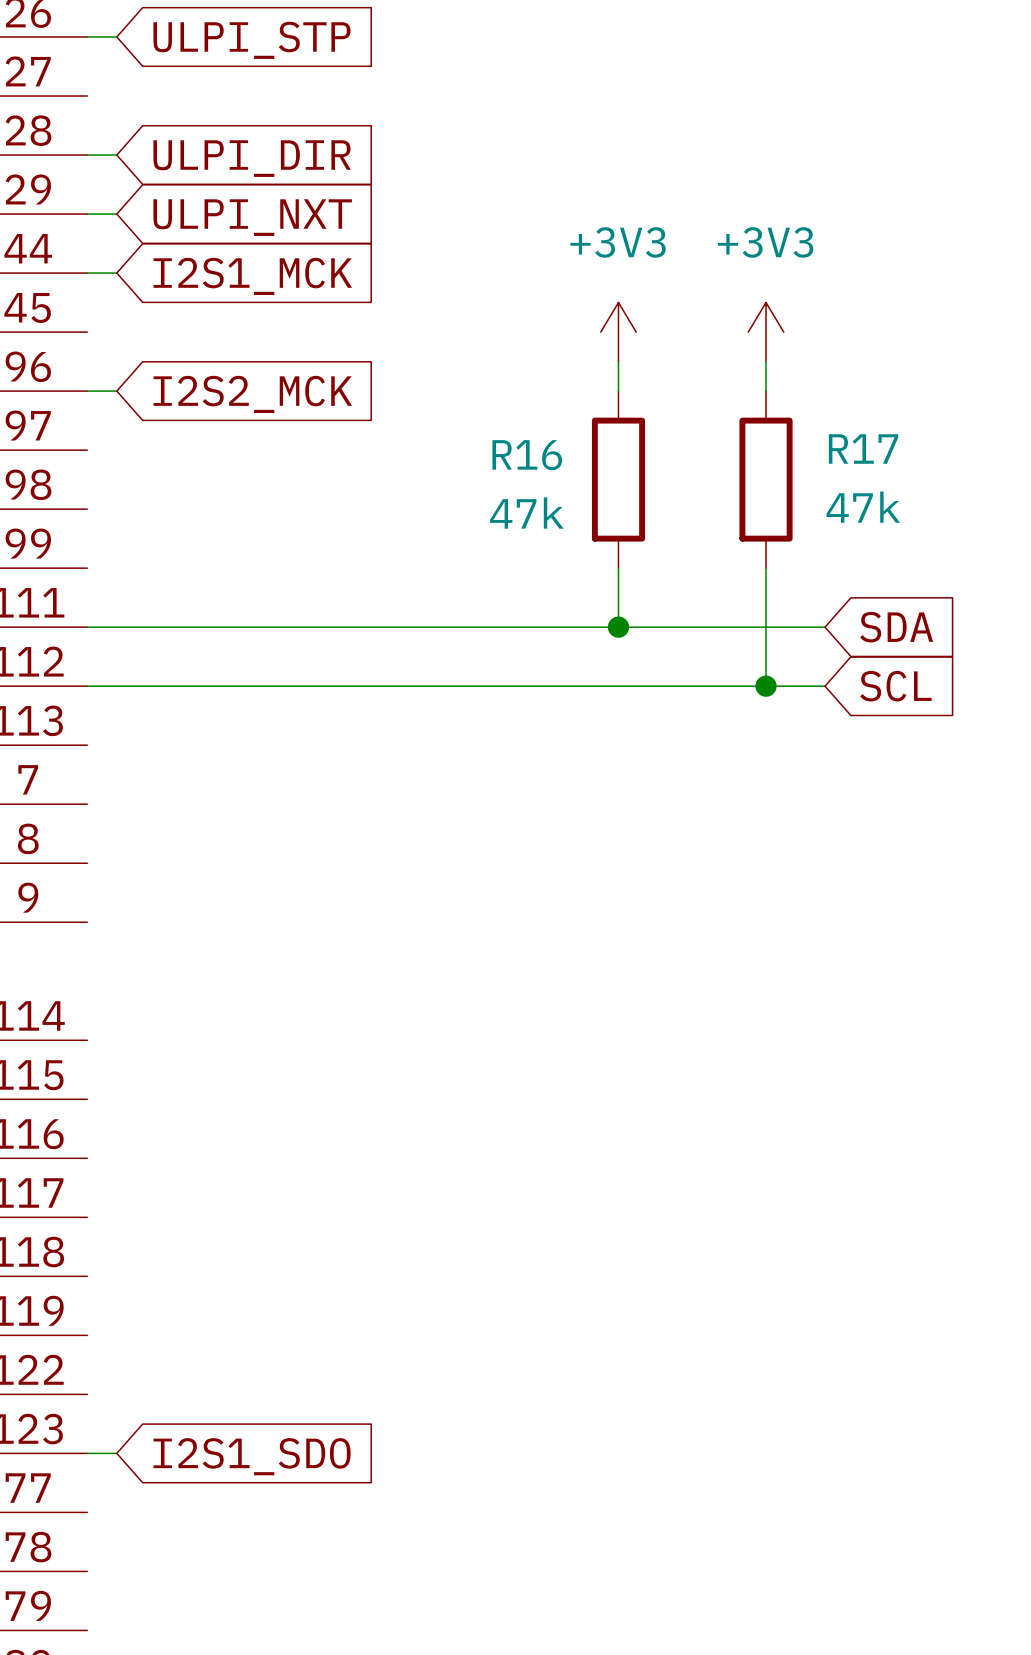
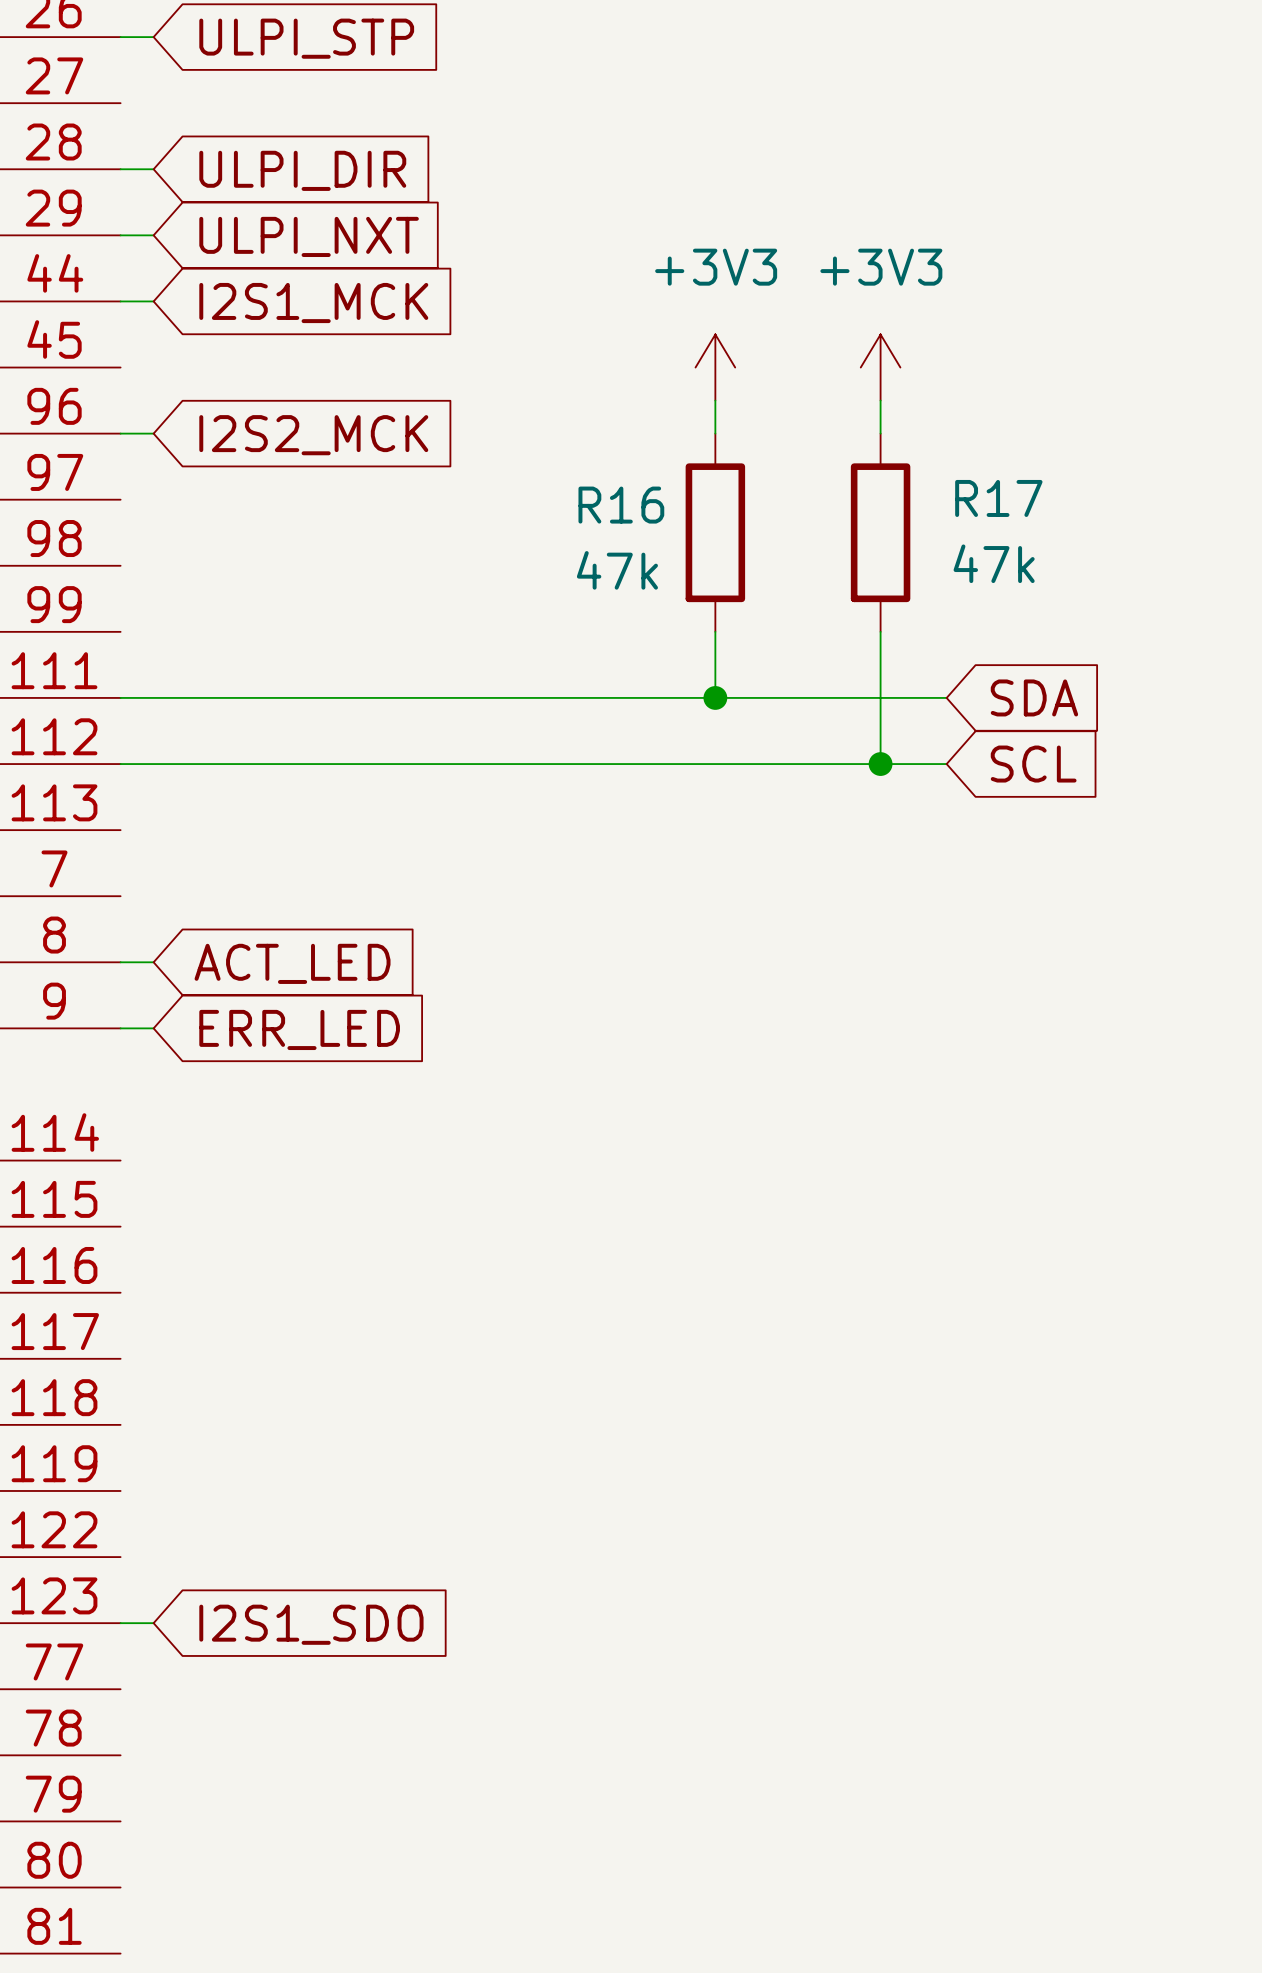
wire: none -> (120, 962) (153, 962)
global label: none -> ACT_LED (292, 963)
wire: none -> (120, 1028) (153, 1028)
global label: none -> ERR_LED (299, 1029)

